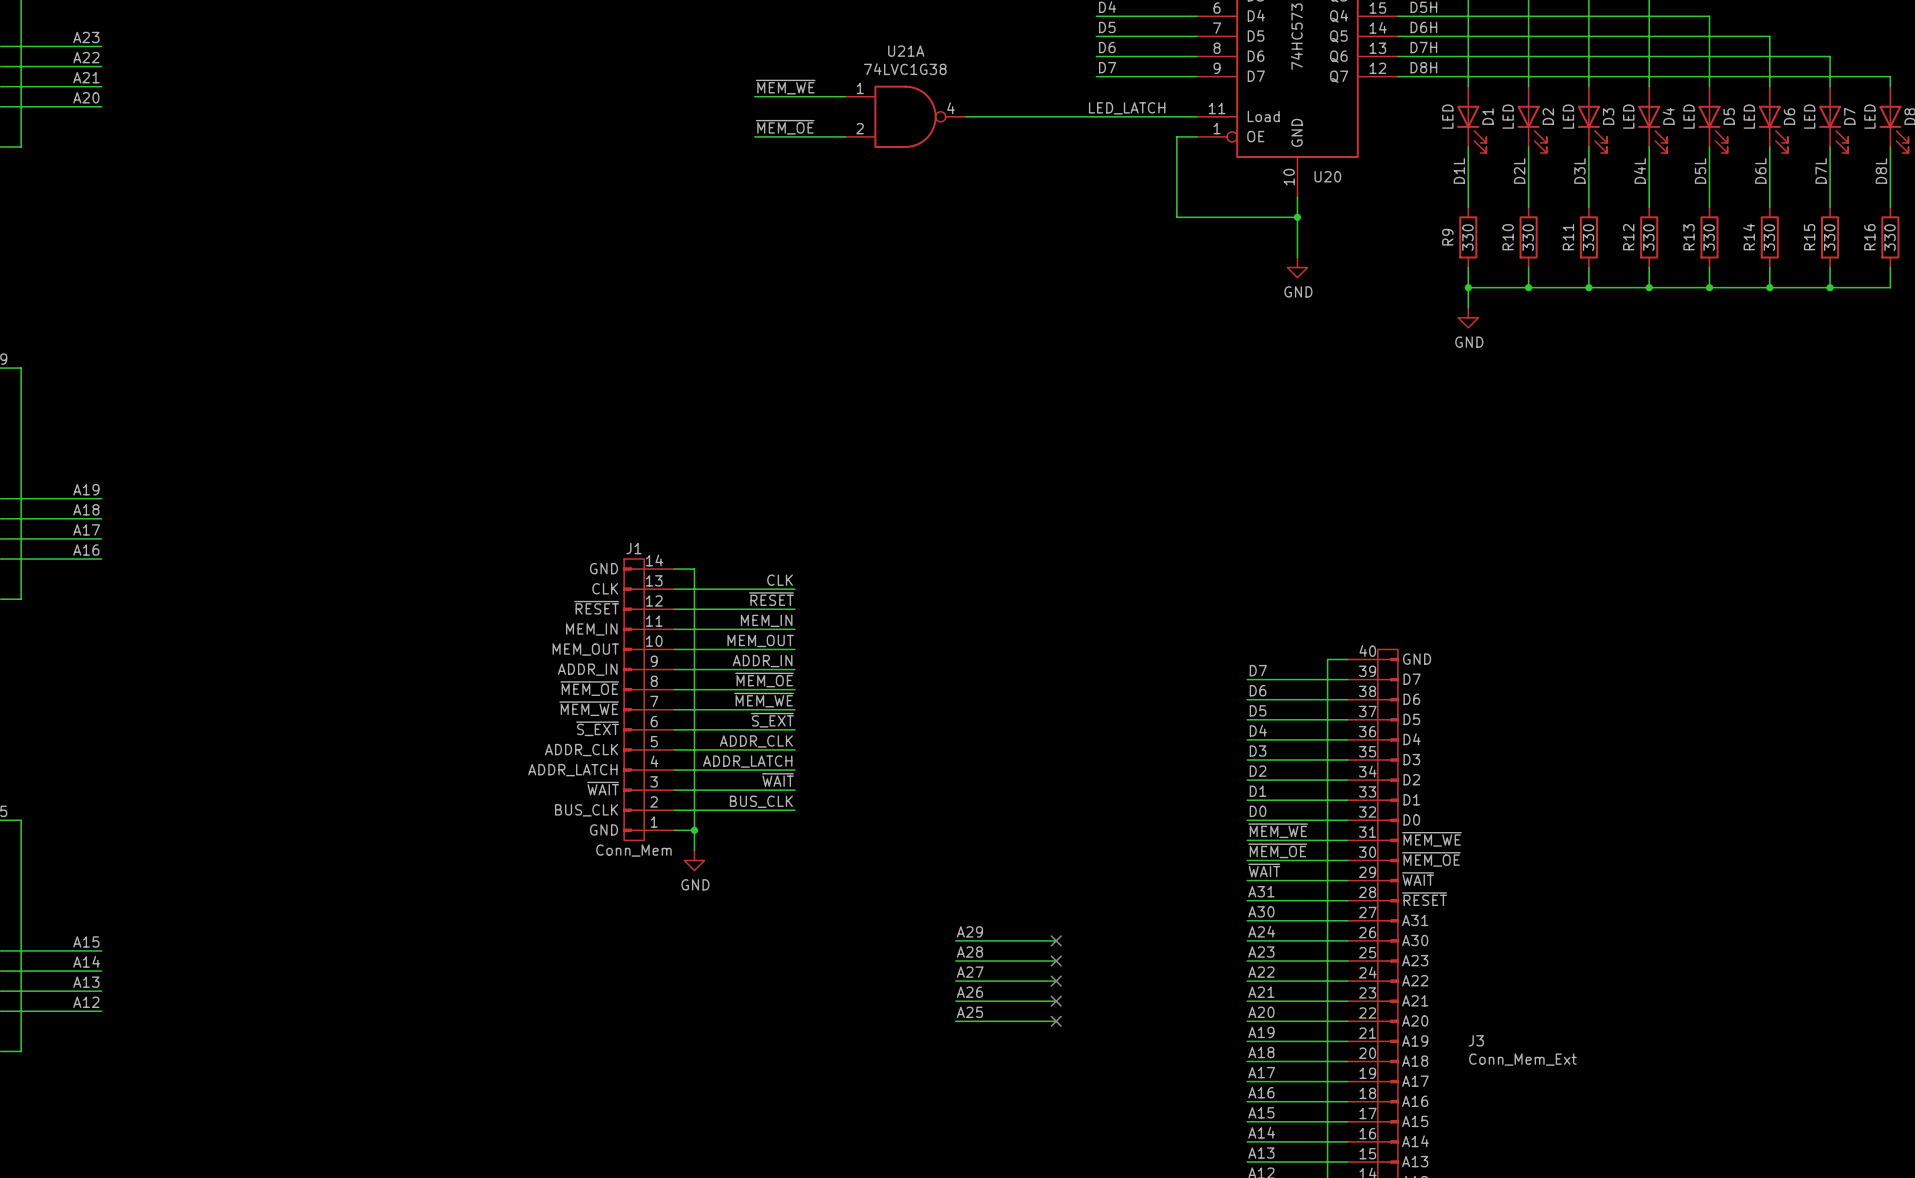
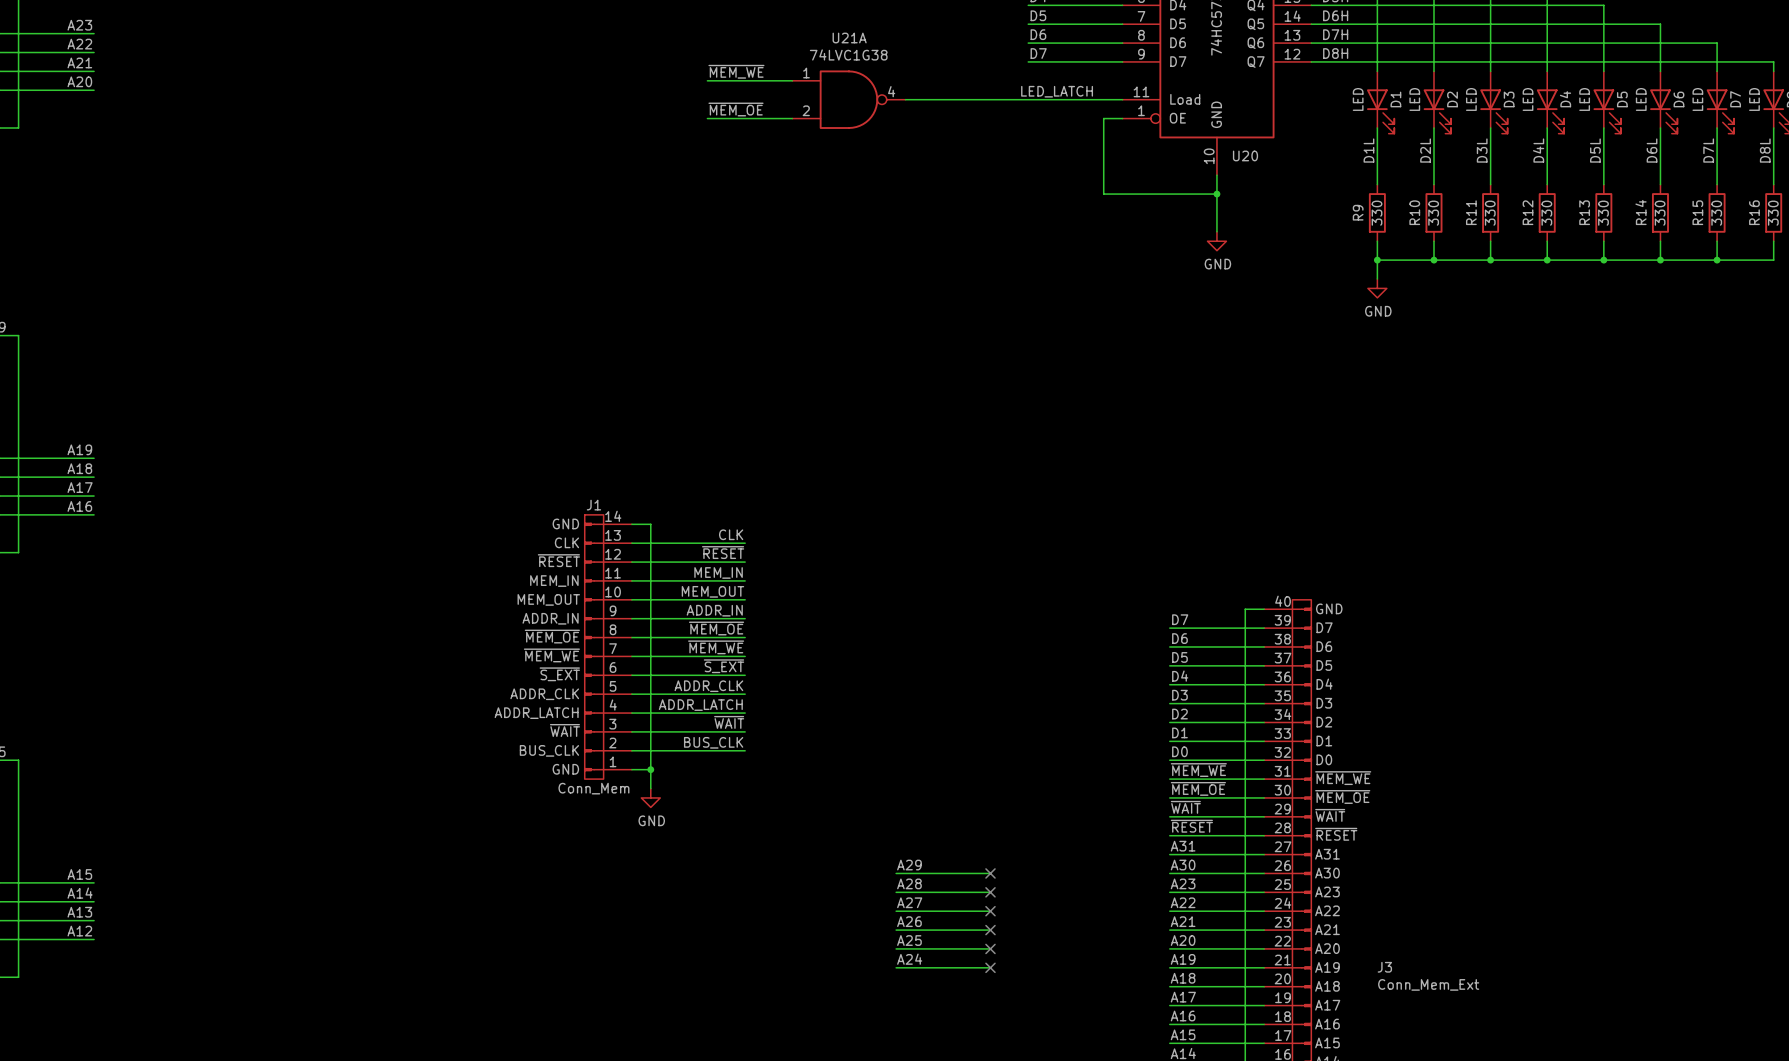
label: A31 (1261, 891) -> ~{RESET} (1191, 826)
label: A30 (1261, 911) -> A31 (1183, 846)
label: A24 (1261, 931) -> A30 (1183, 865)
label: none -> A24 (909, 959)
wire: none -> (896, 967) (990, 967)
no-connect mark: none -> (990, 967)

